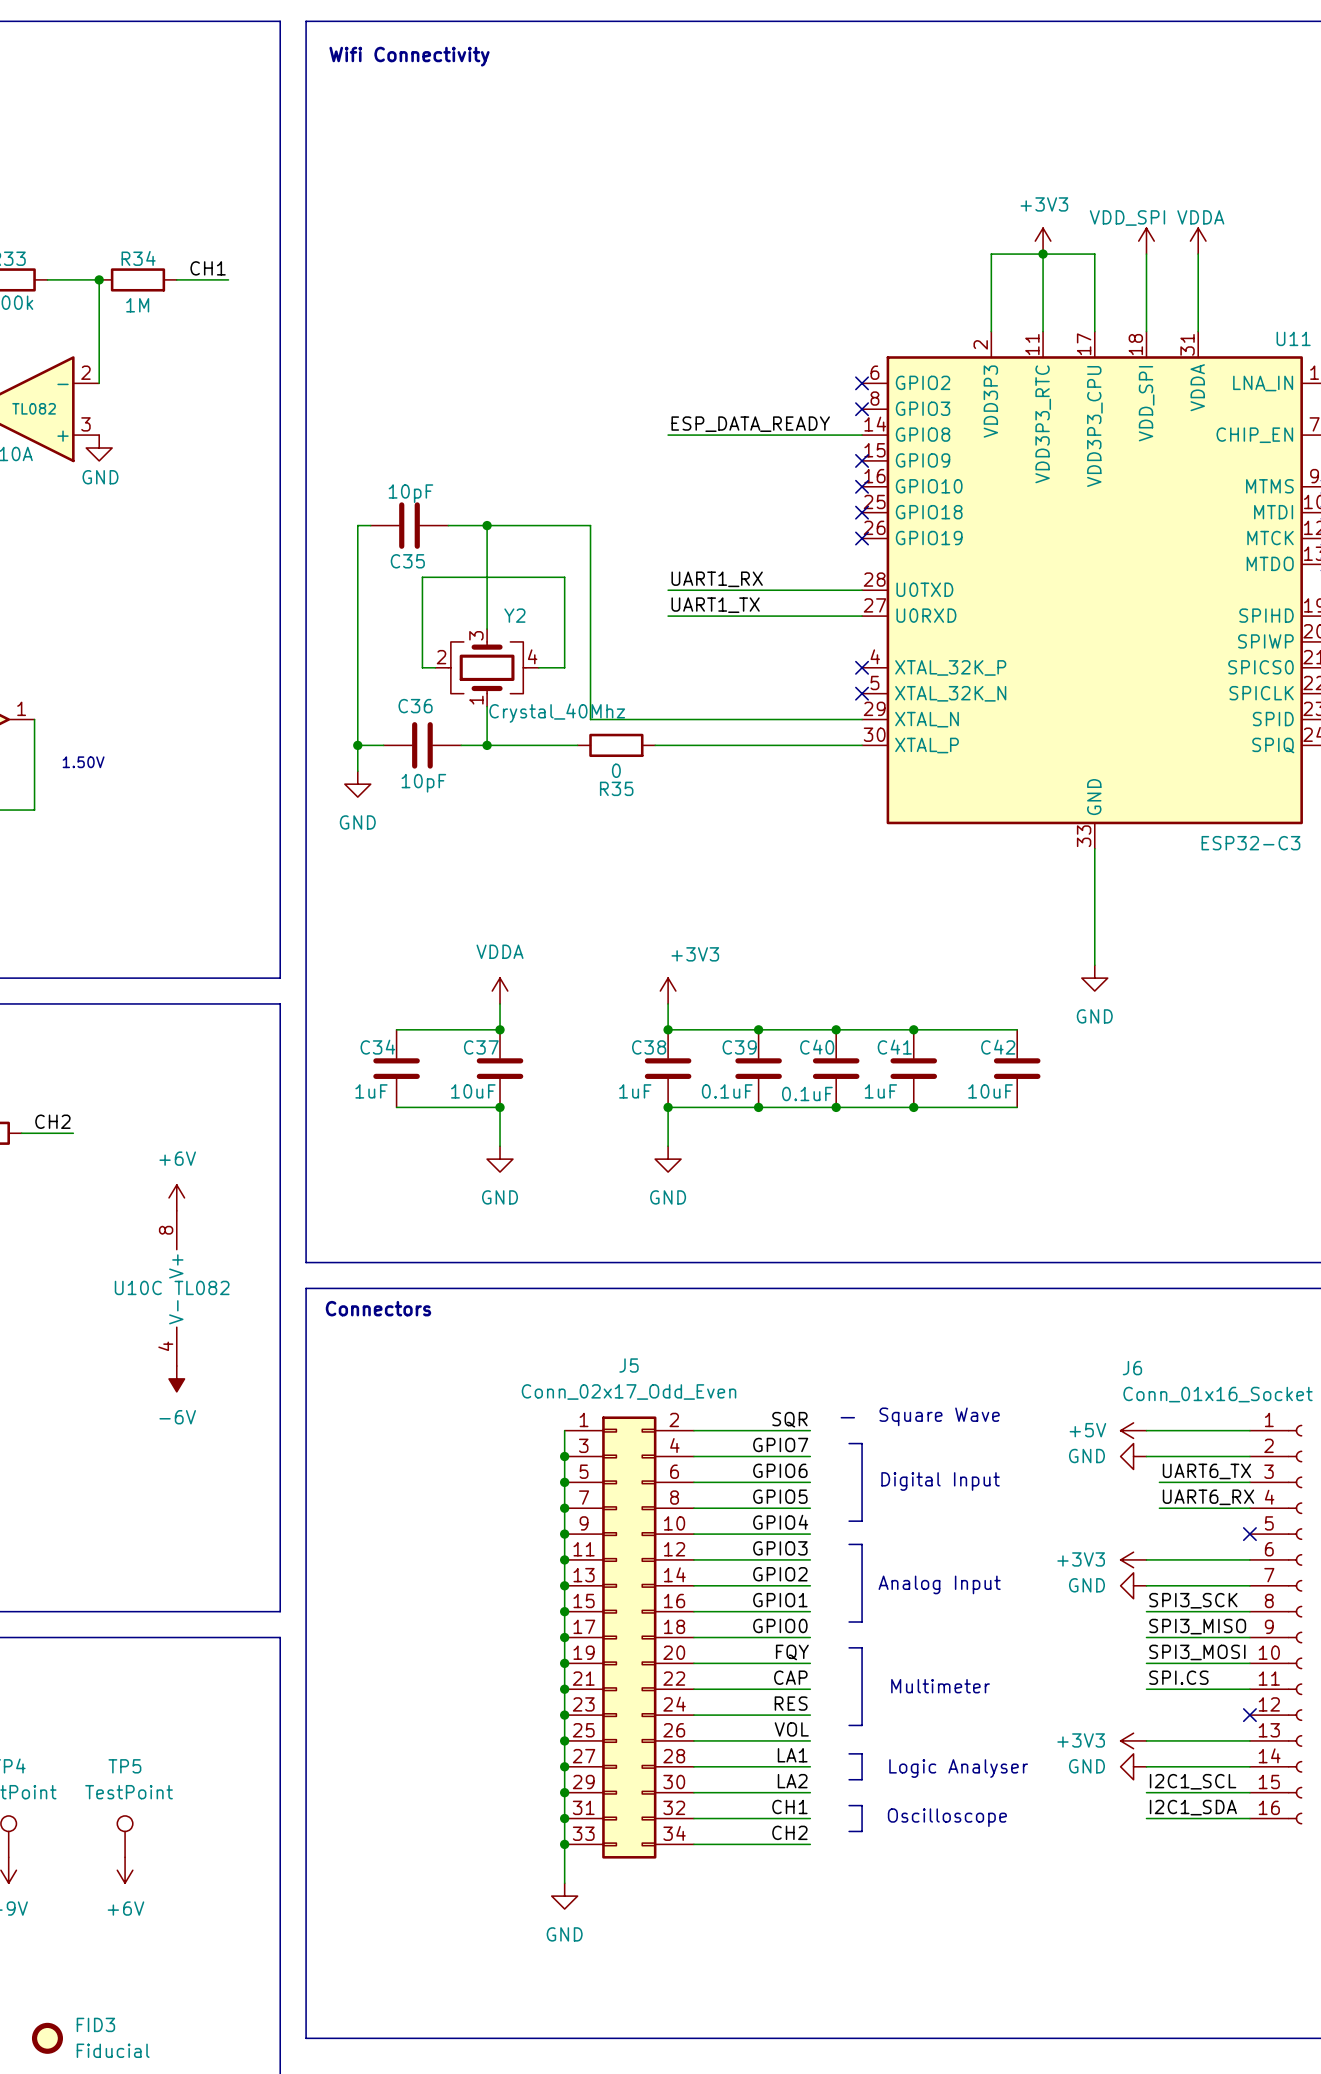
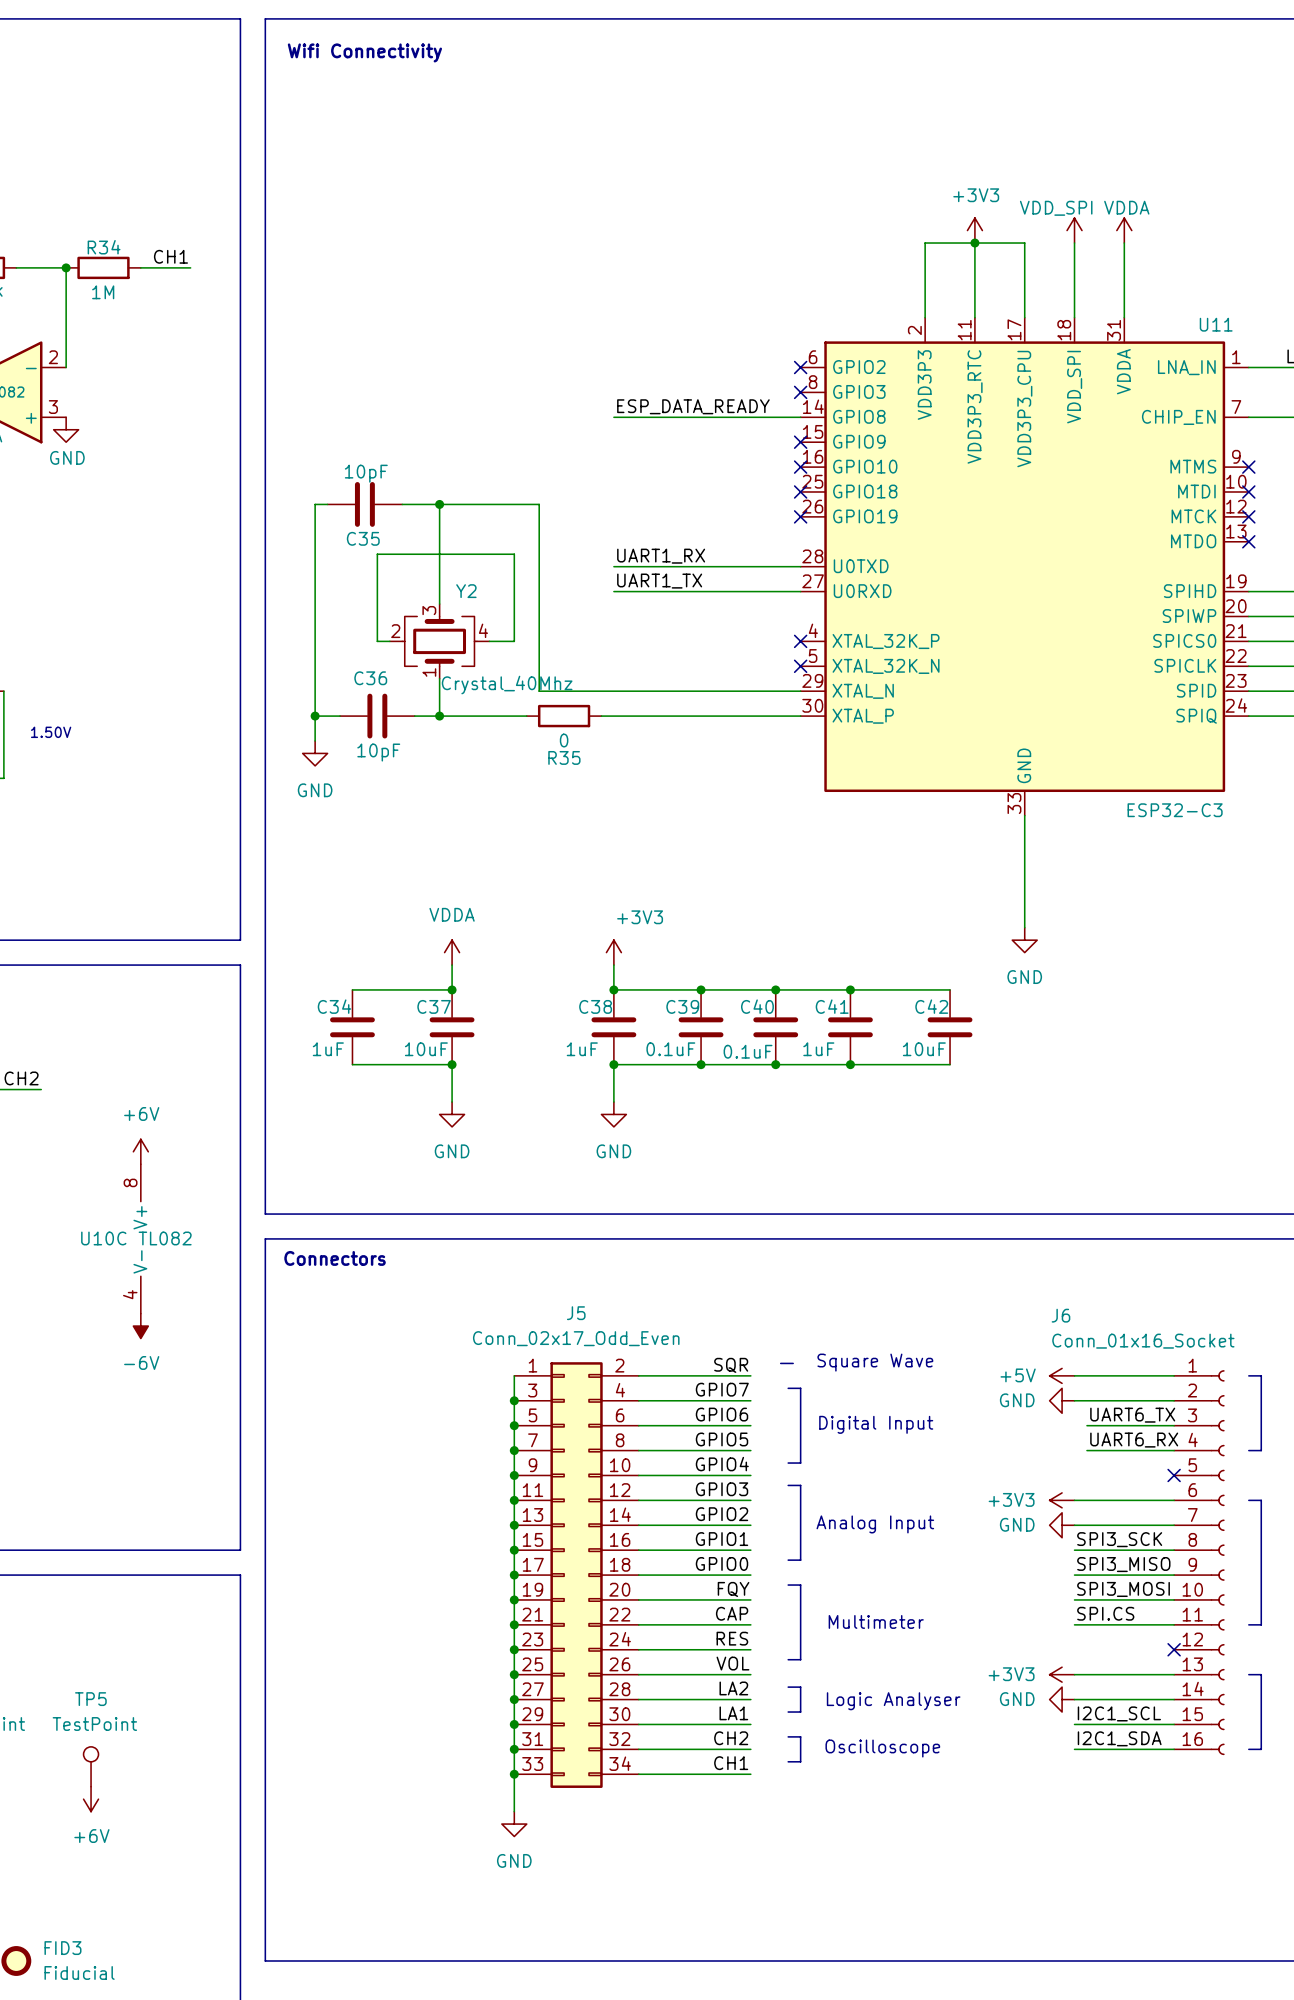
label: LA1 (792, 1755) -> LA2 (733, 1688)
label: LA2 (792, 1781) -> LA1 (733, 1713)
label: CH1 (789, 1806) -> CH2 (731, 1738)
label: CH2 (789, 1832) -> CH1 (731, 1763)

